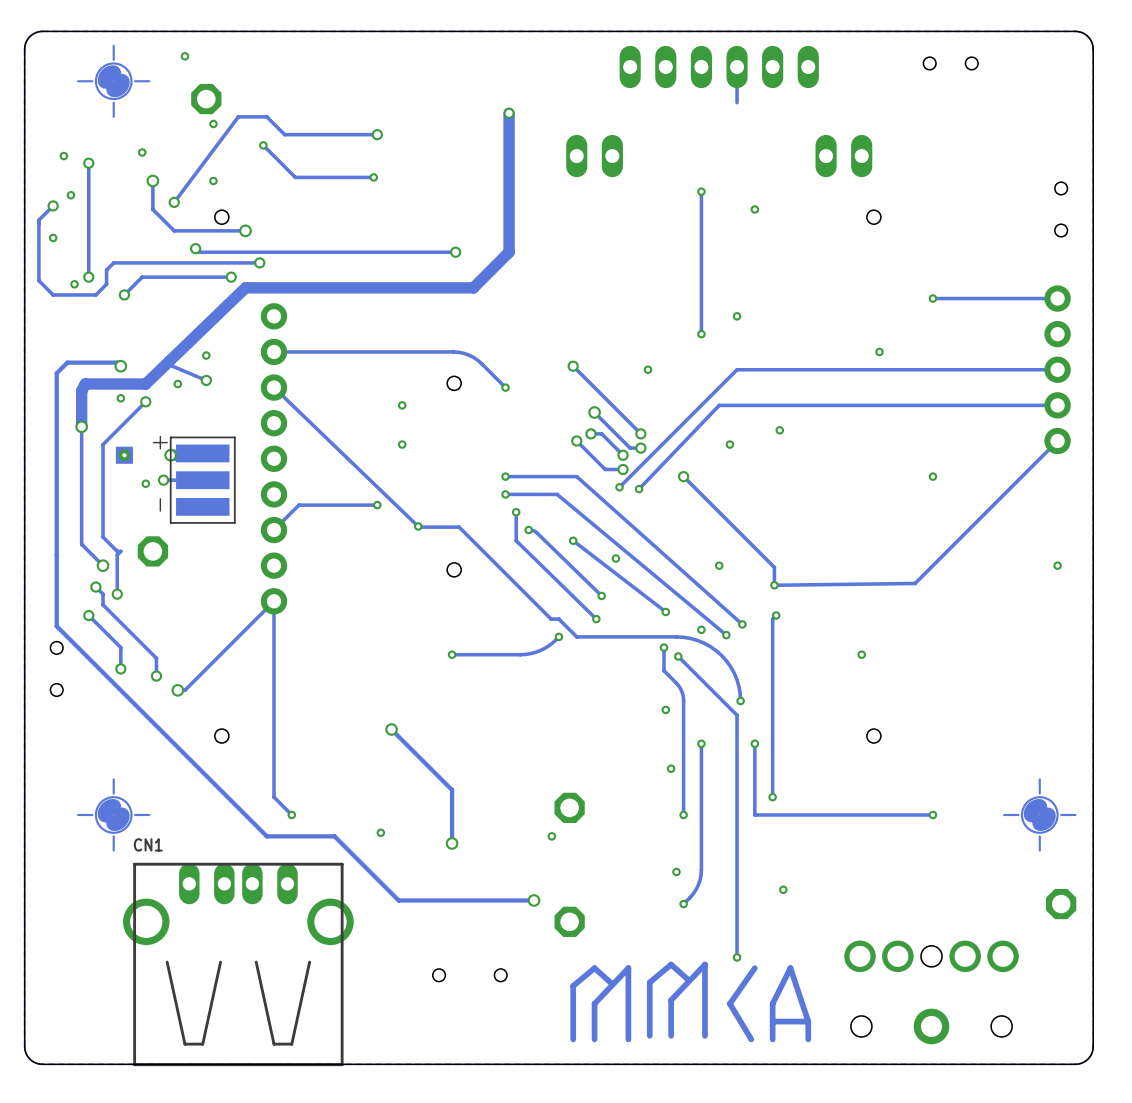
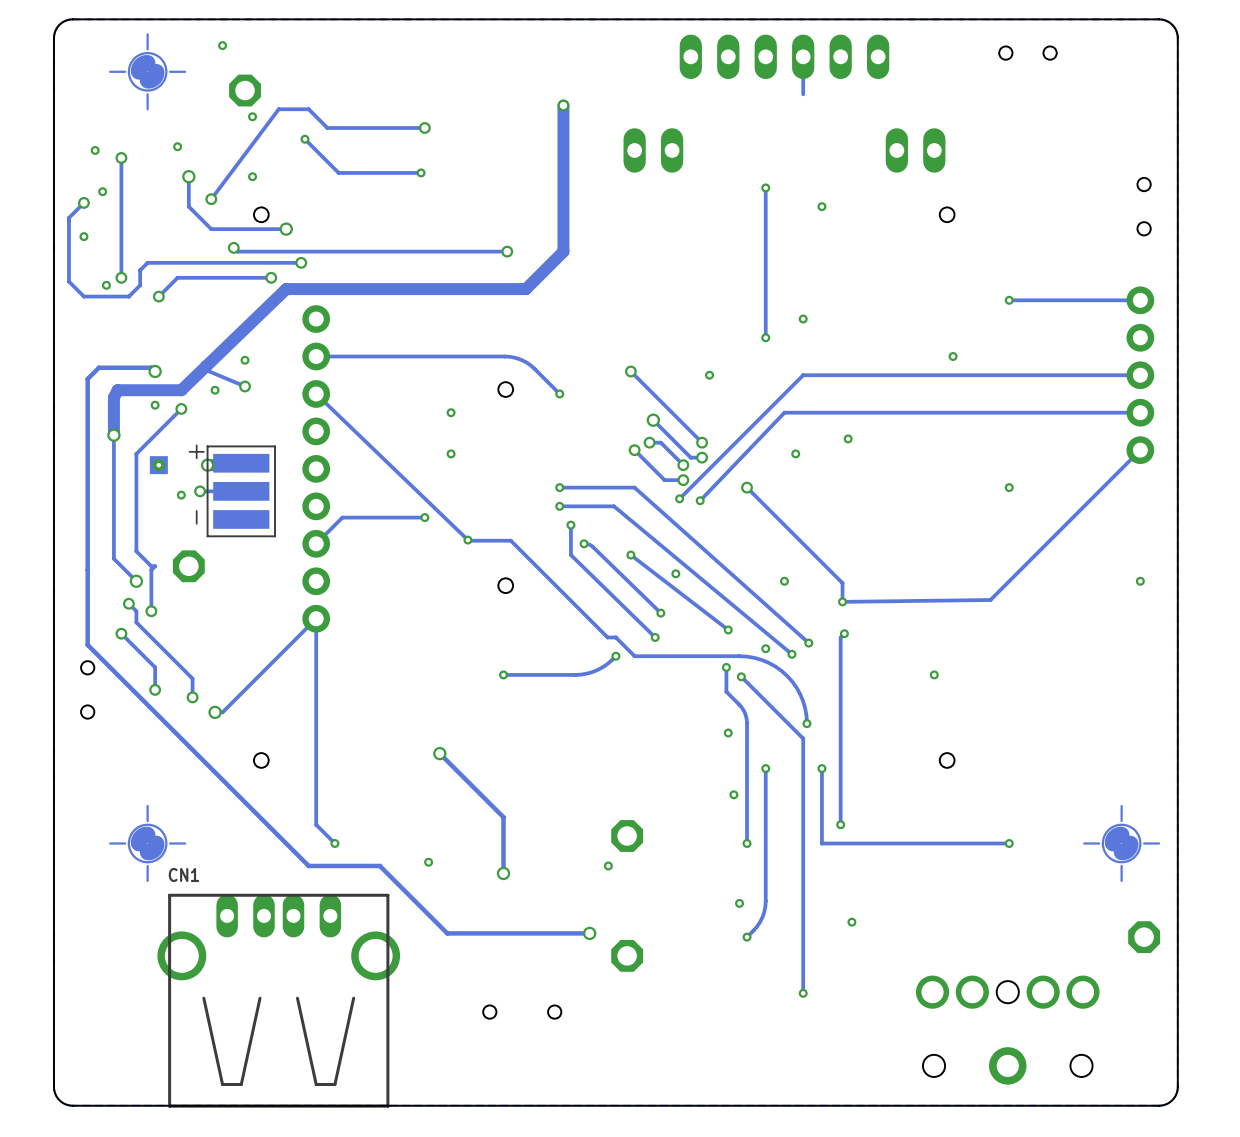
track: (754, 968) (729, 1003) (751, 1039) -> none
track: (687, 978) (671, 964) (649, 982) (649, 1035) -> none
track: (612, 984) (594, 968) (573, 985) (573, 1039) -> none
track: (808, 1021) (790, 968) (772, 1003) (772, 1039) -> none
track: (808, 1021) (808, 1039) -> none
track: (808, 1021) (772, 1021) -> none
track: (704, 1035) (704, 964) (671, 1000) (671, 1035) -> none
track: (628, 1039) (628, 968) (594, 1003) (594, 1039) -> none

